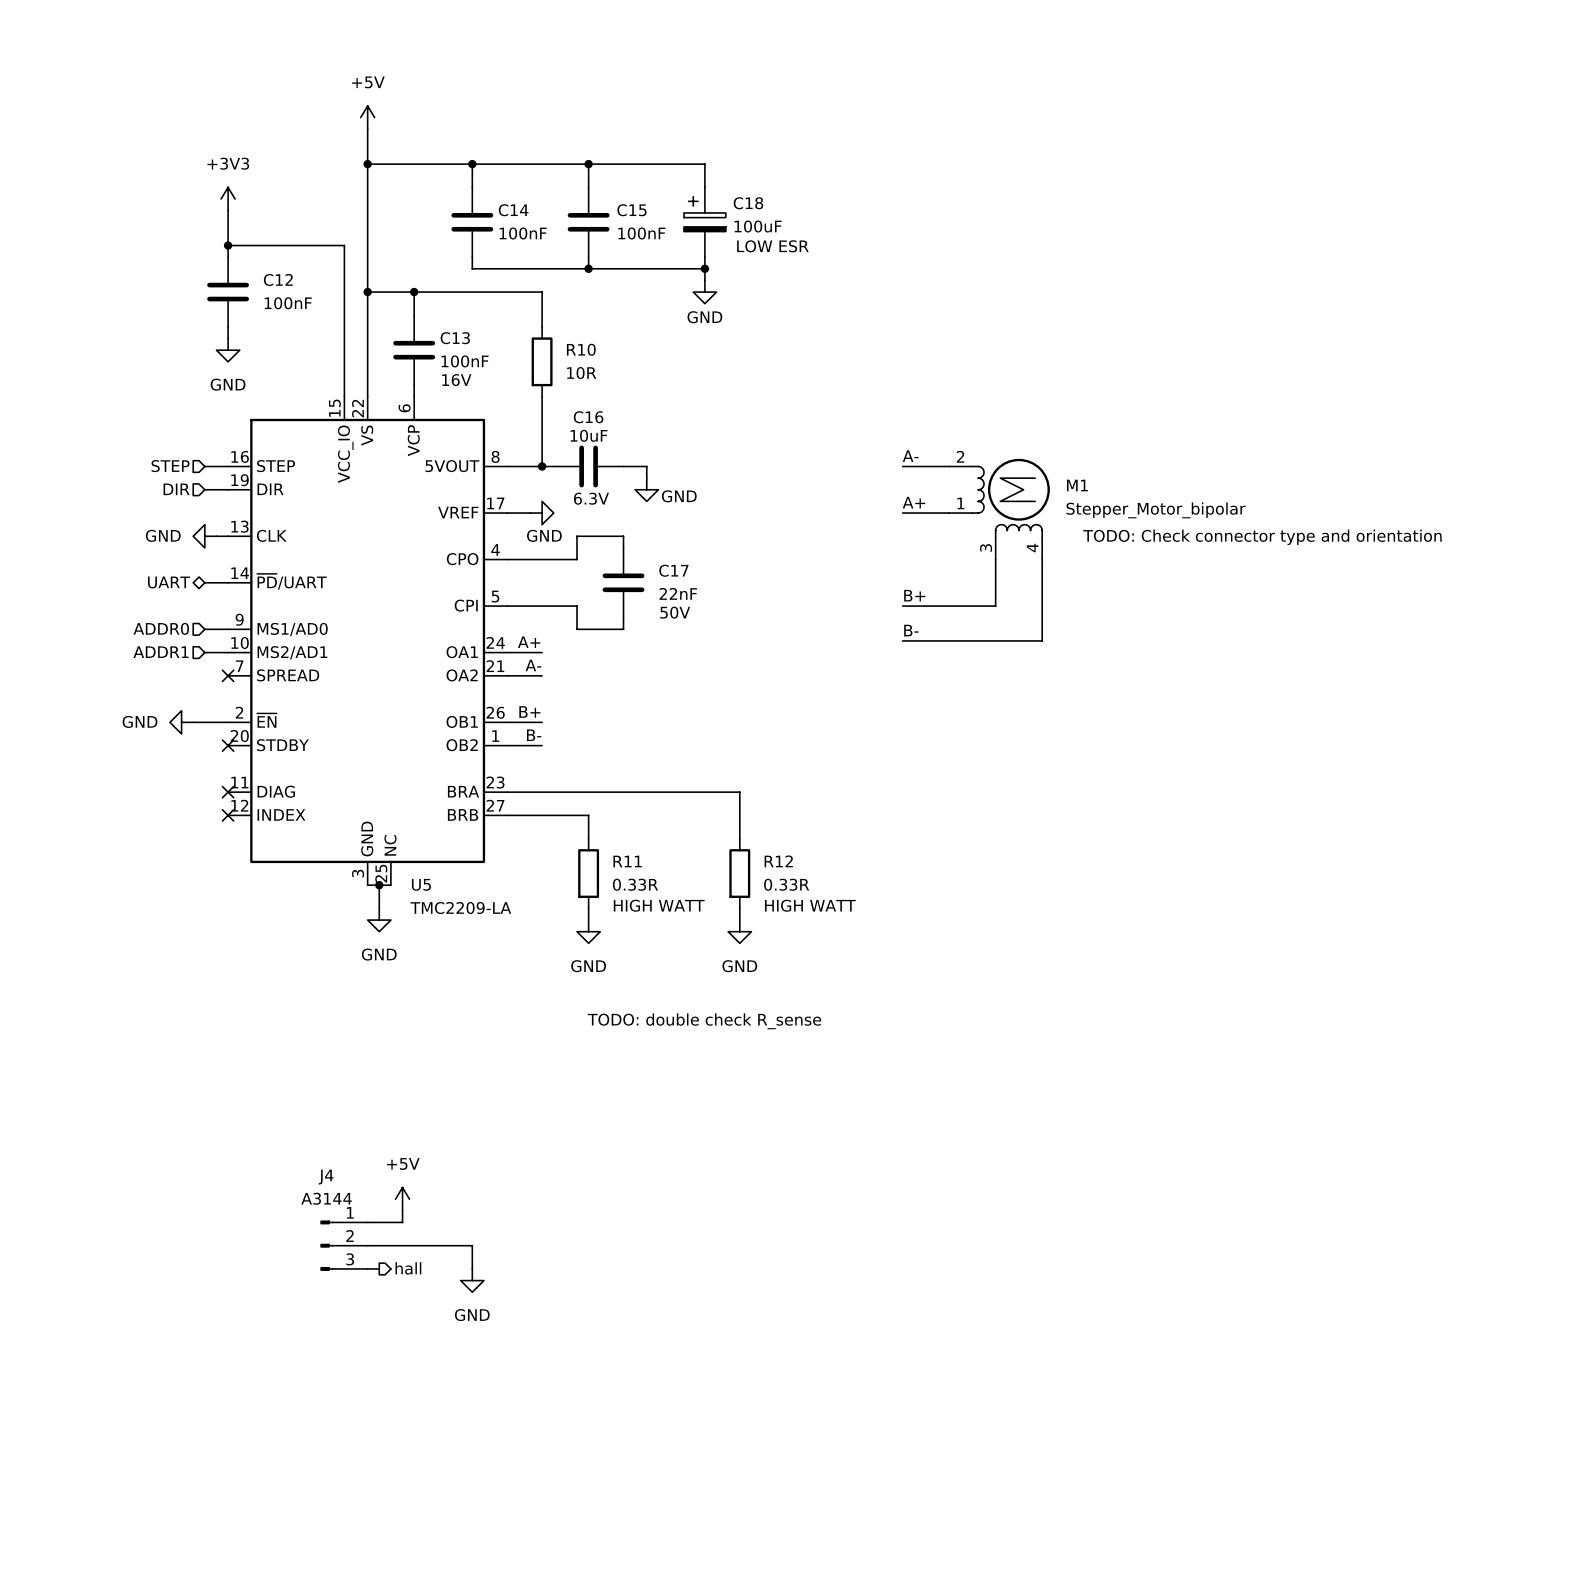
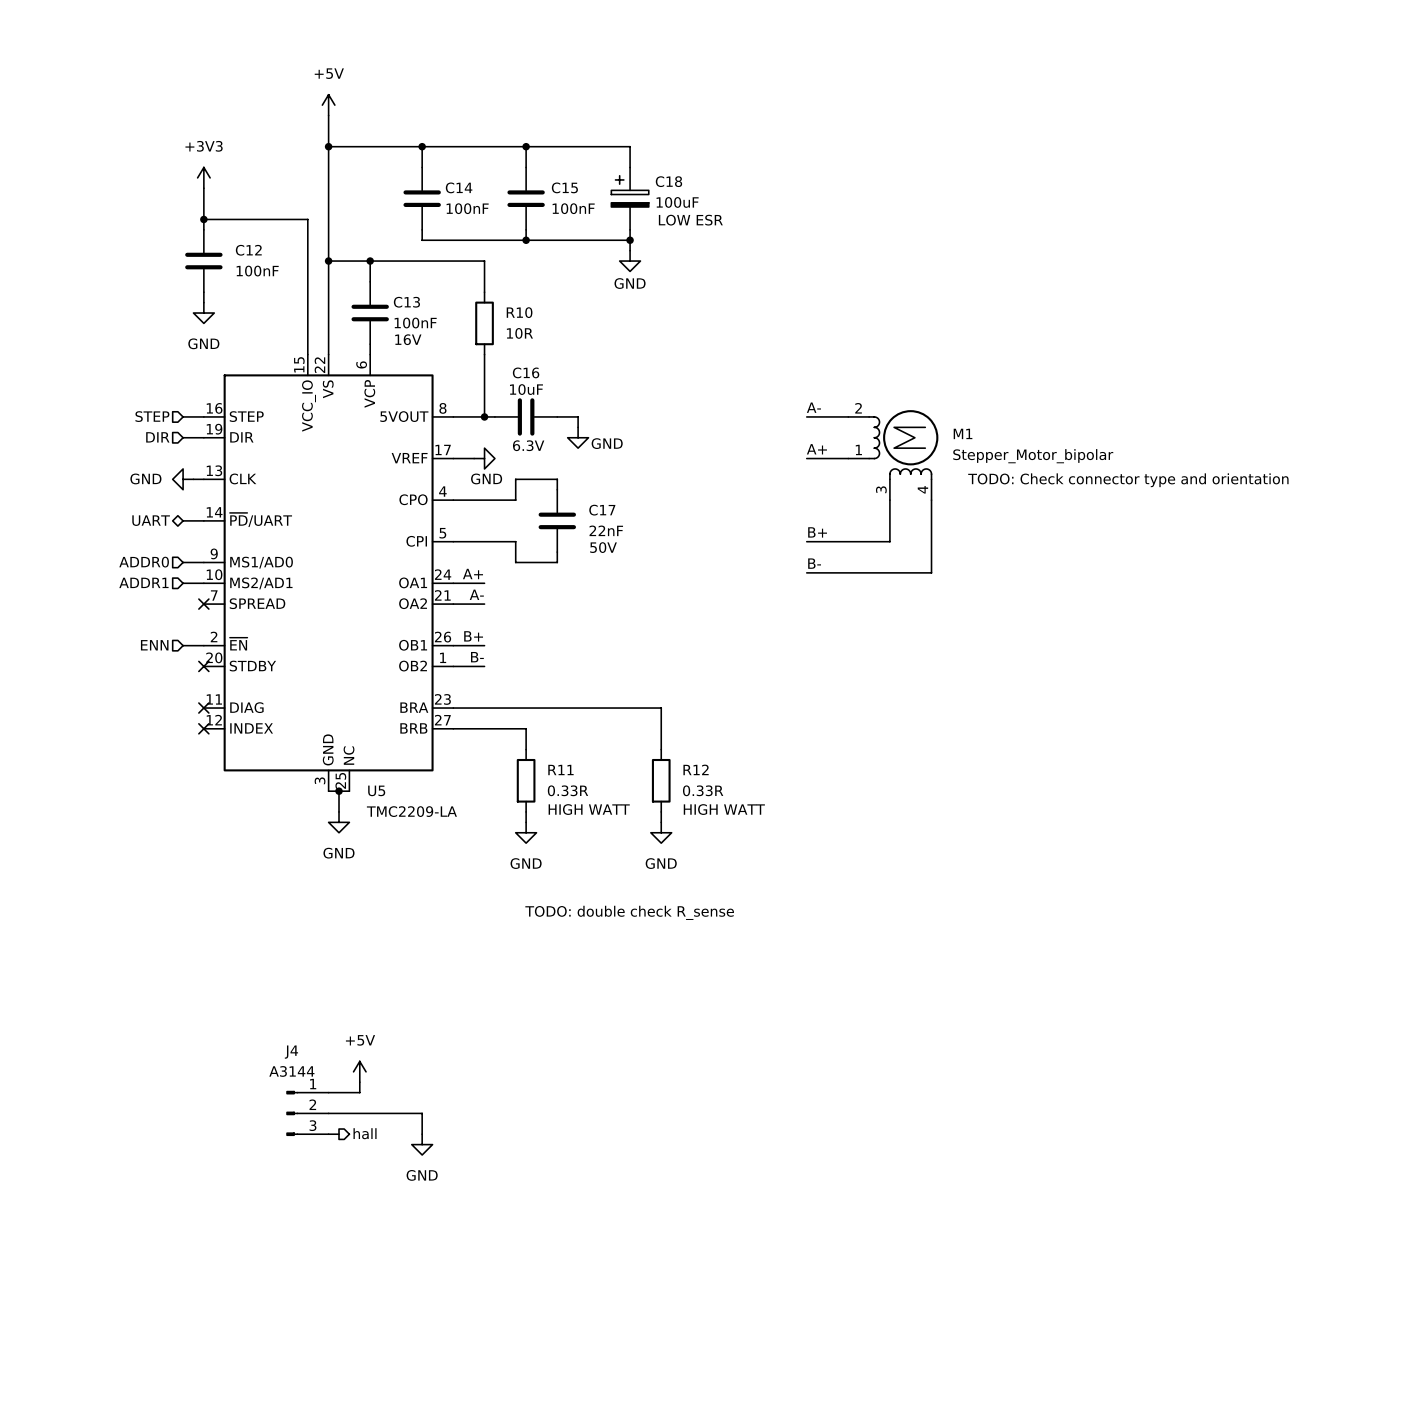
hierarchical label: none -> ENN (154, 645)
power symbol: GND (181, 722) -> none
wire: (193, 722) (204, 722) -> none

